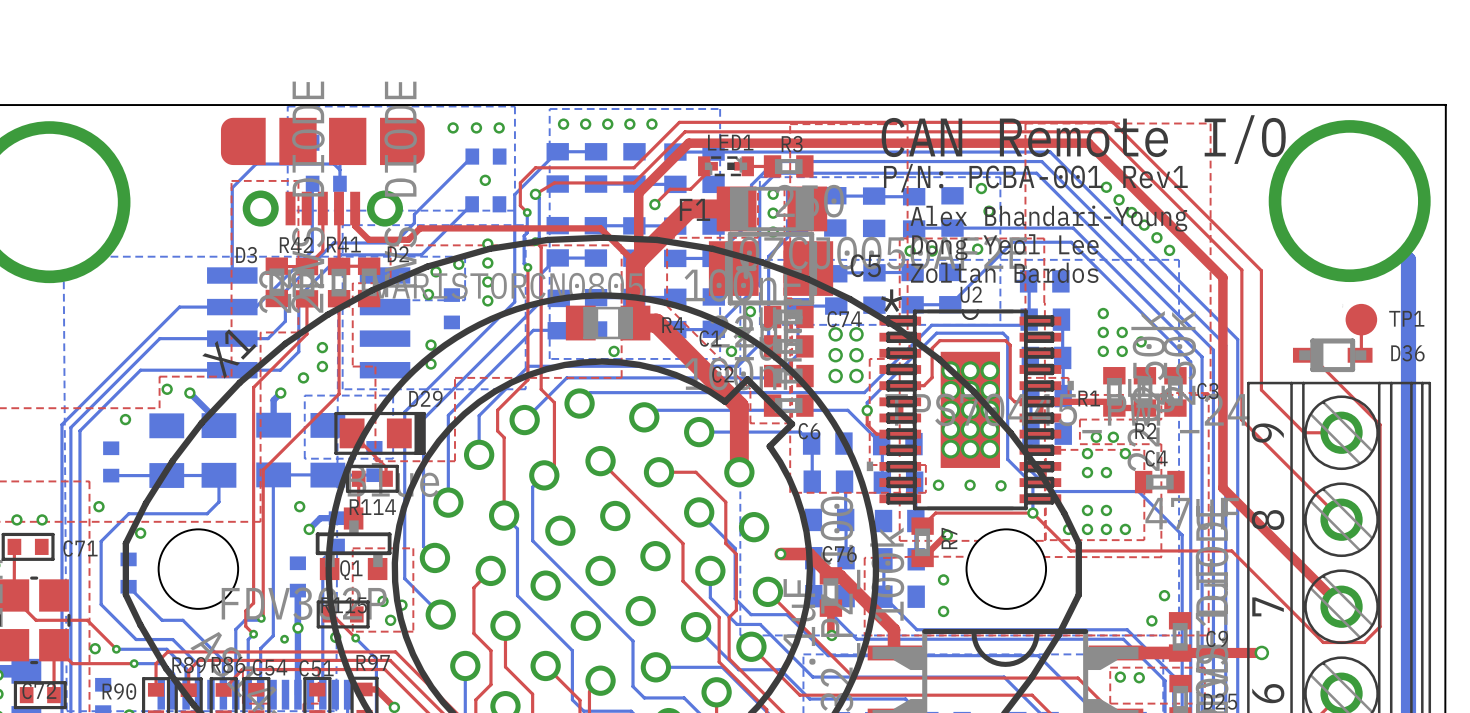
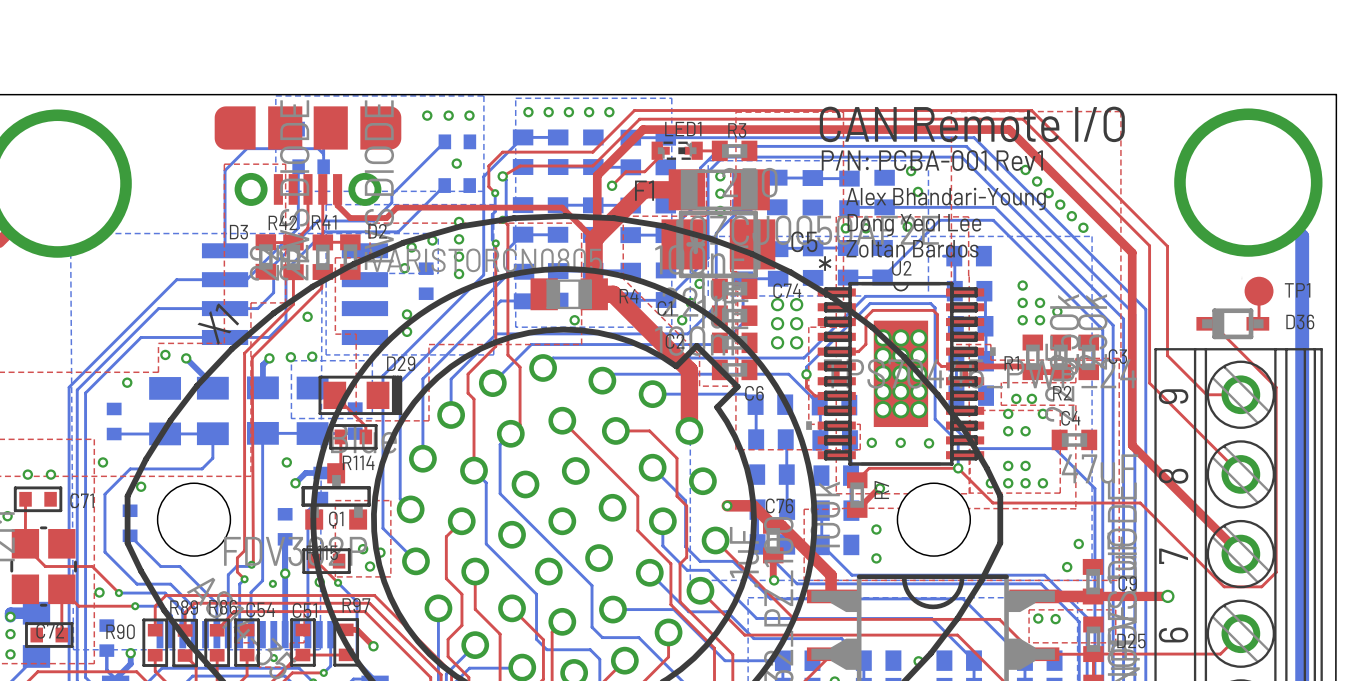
top track: (339, 298) (339, 394) (263, 469) (263, 616) -> (322, 272) (321, 288) (252, 357) (253, 563)
via: (322, 366) -> none
via: (303, 377) -> none
via: none -> (290, 357)
via: none -> (312, 356)

